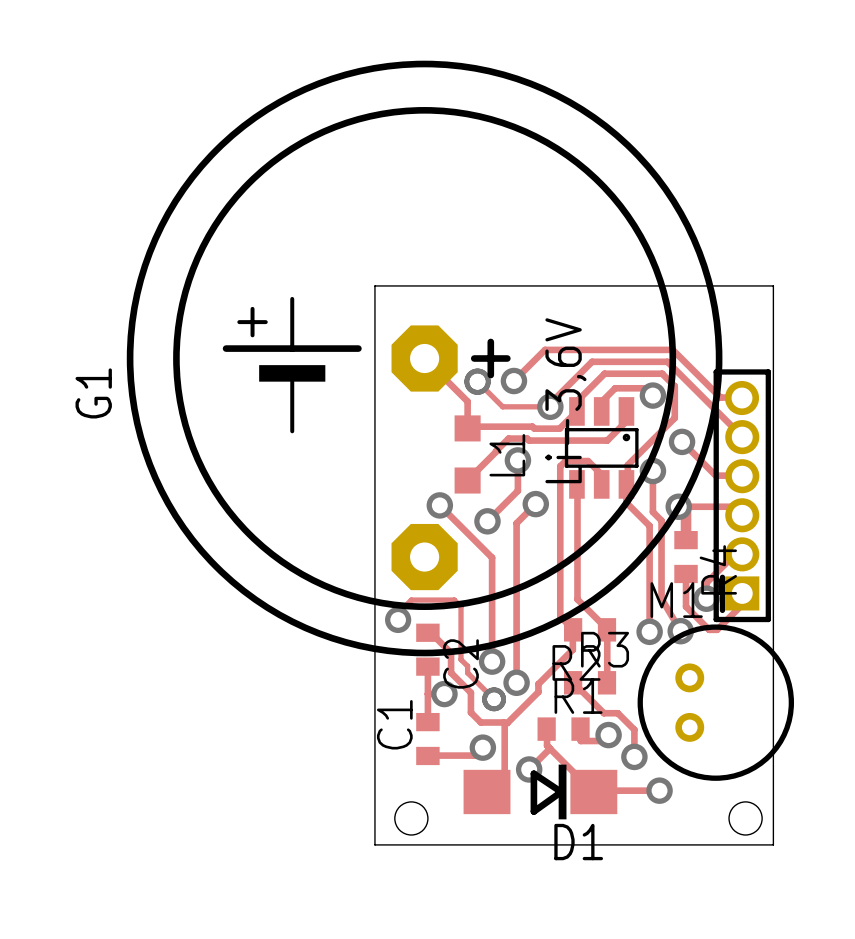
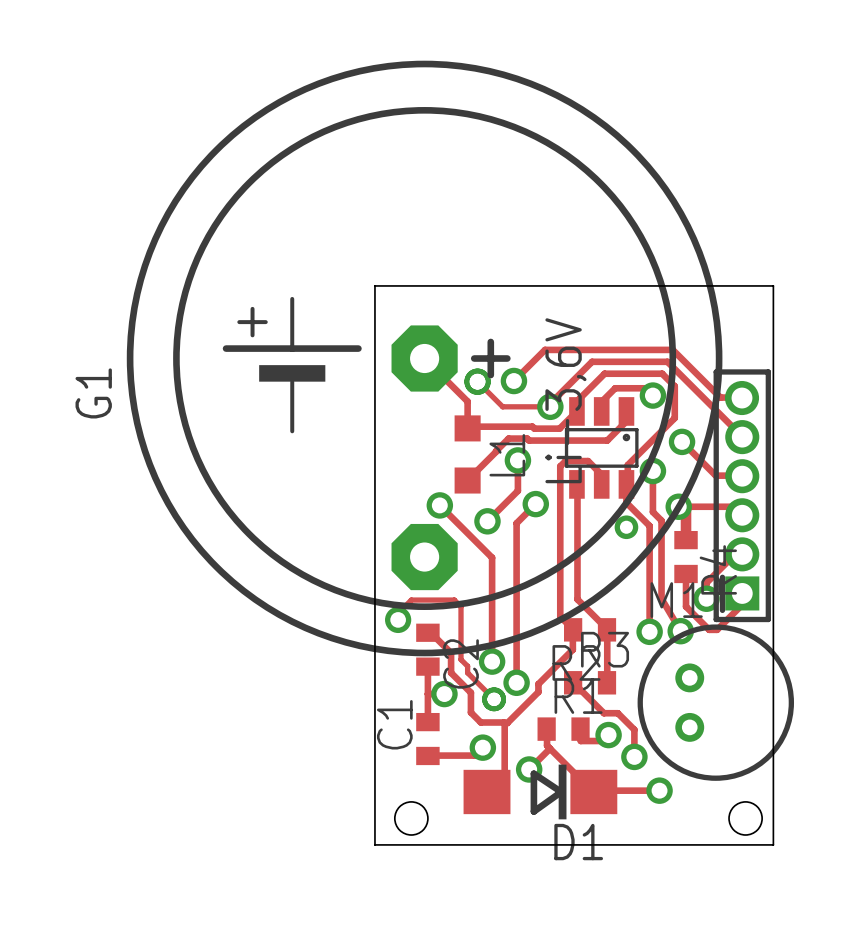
via: none -> (626, 527)

